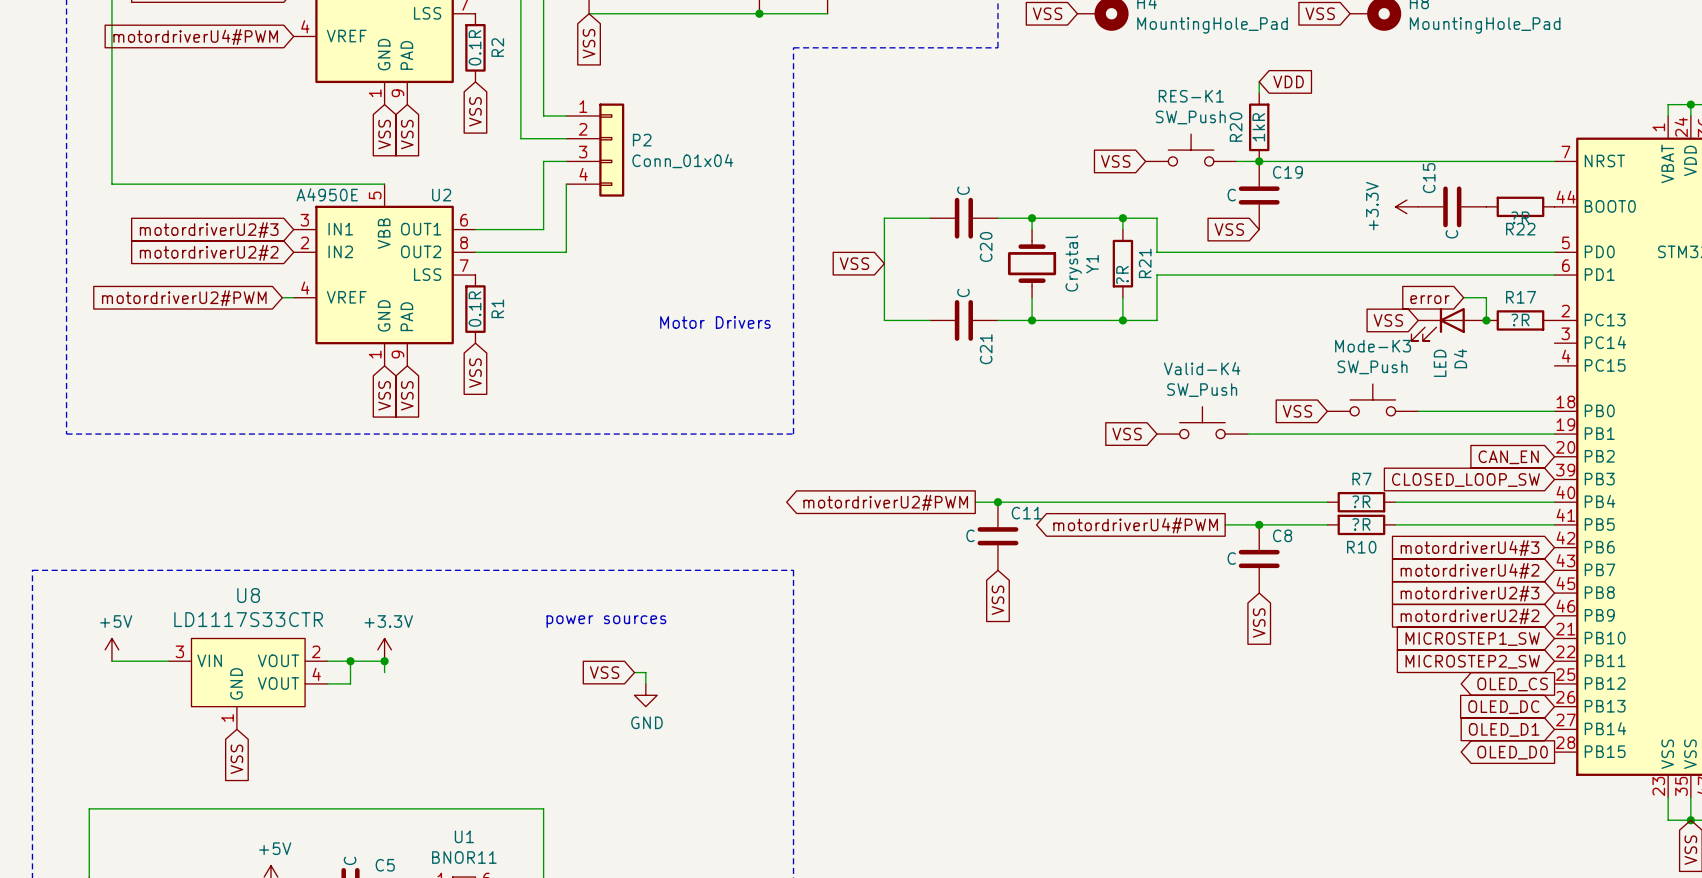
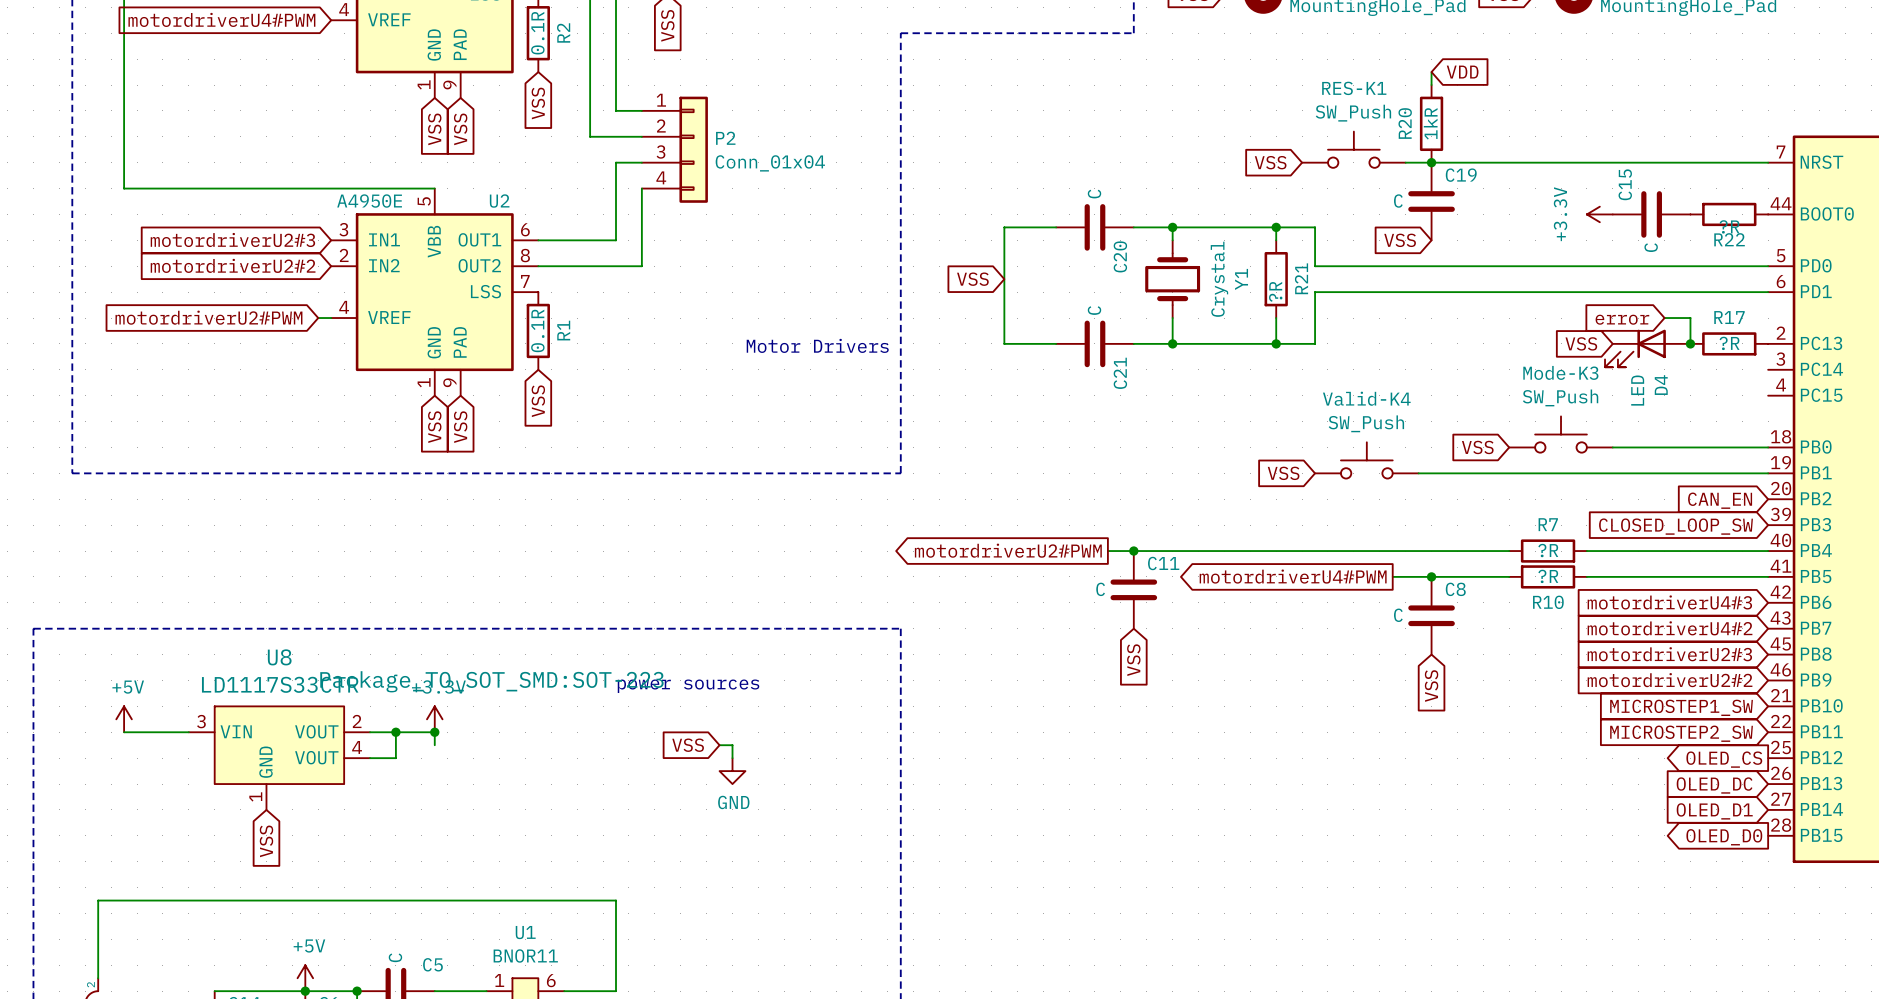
U8 text: none -> Package_TO_SOT_SMD:SOT-223 (491, 681)

